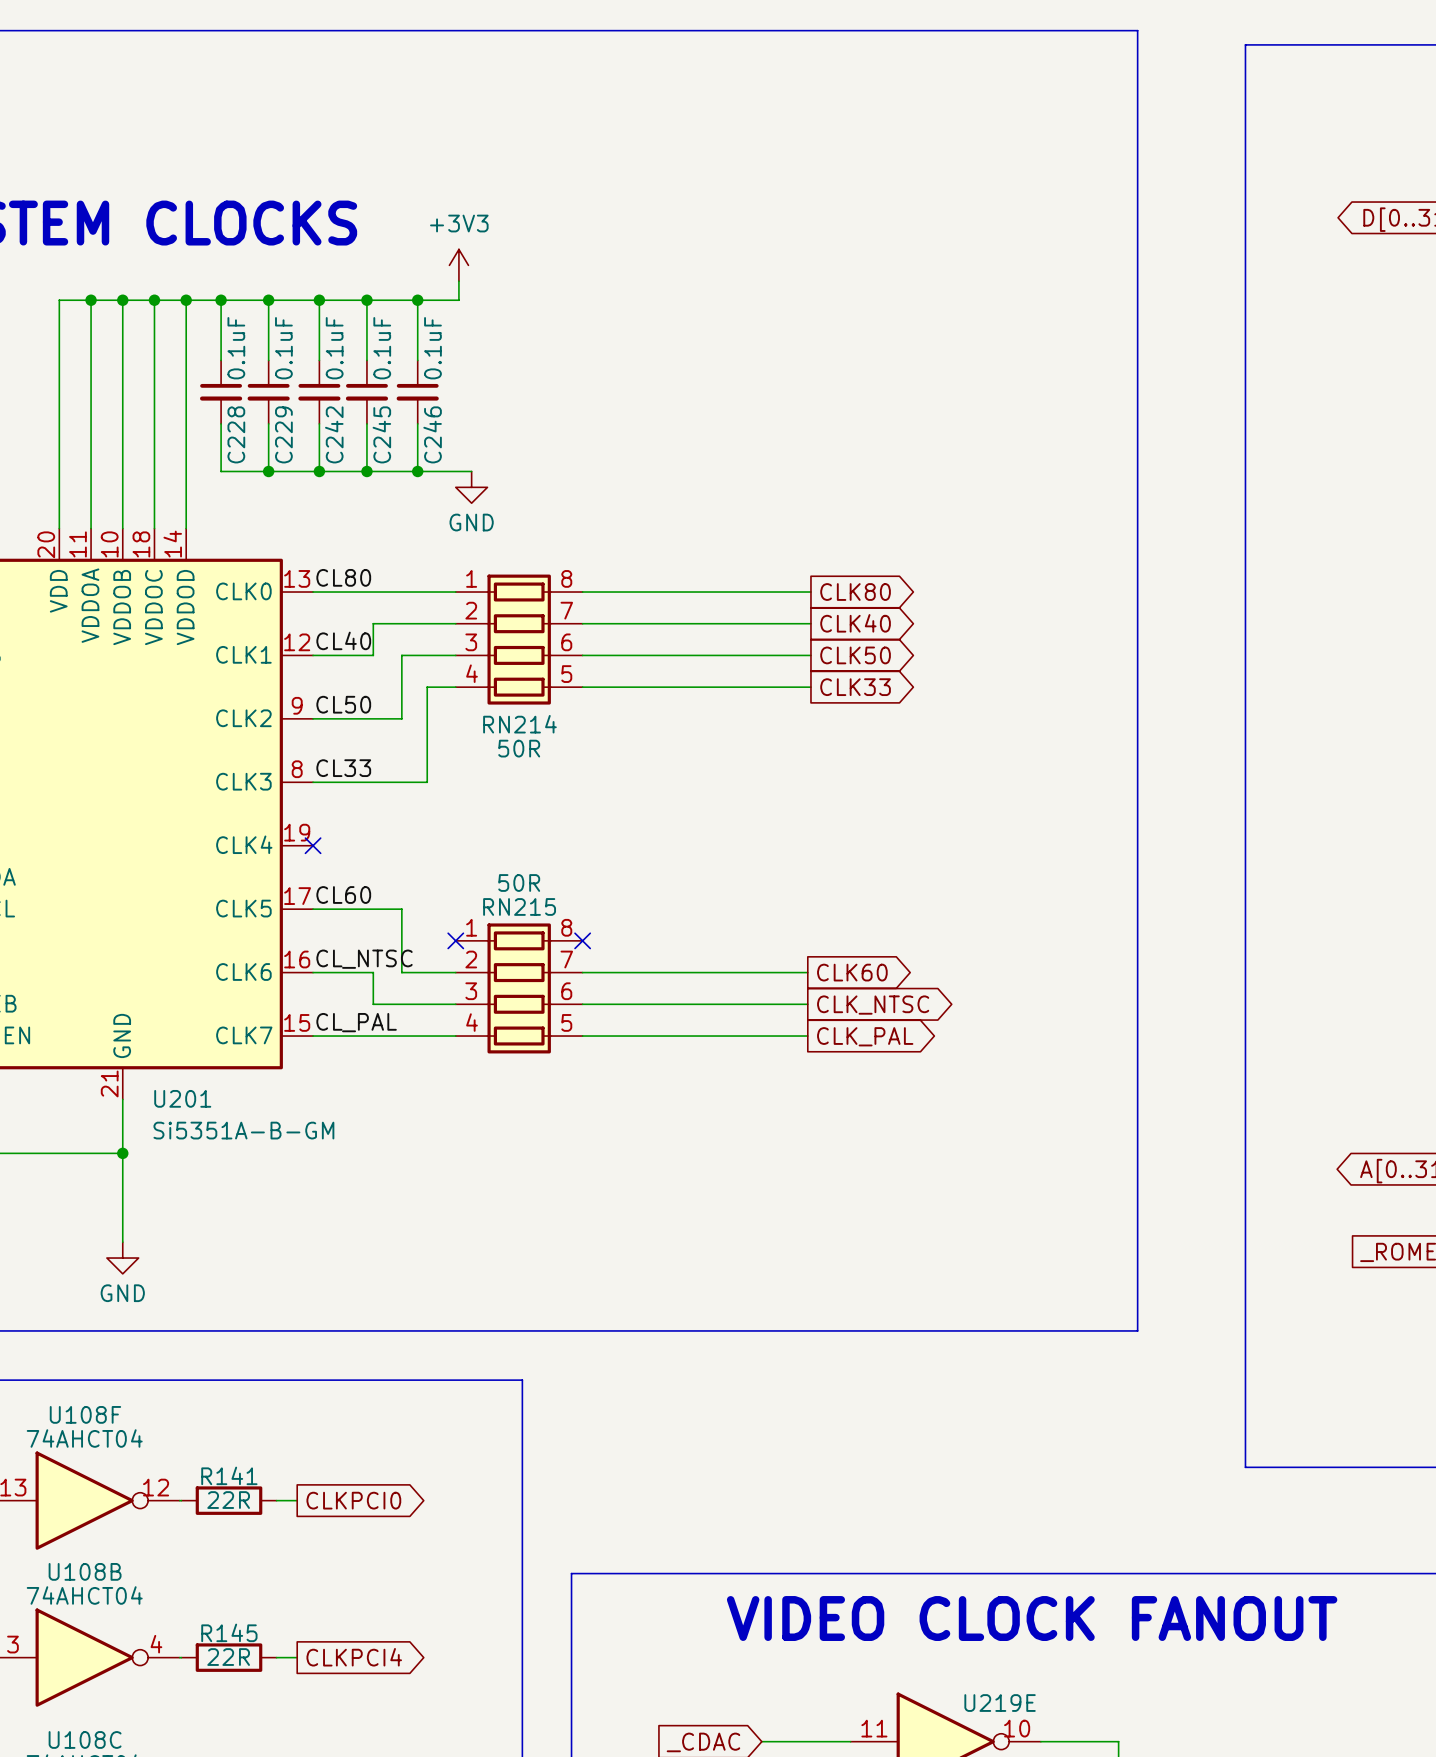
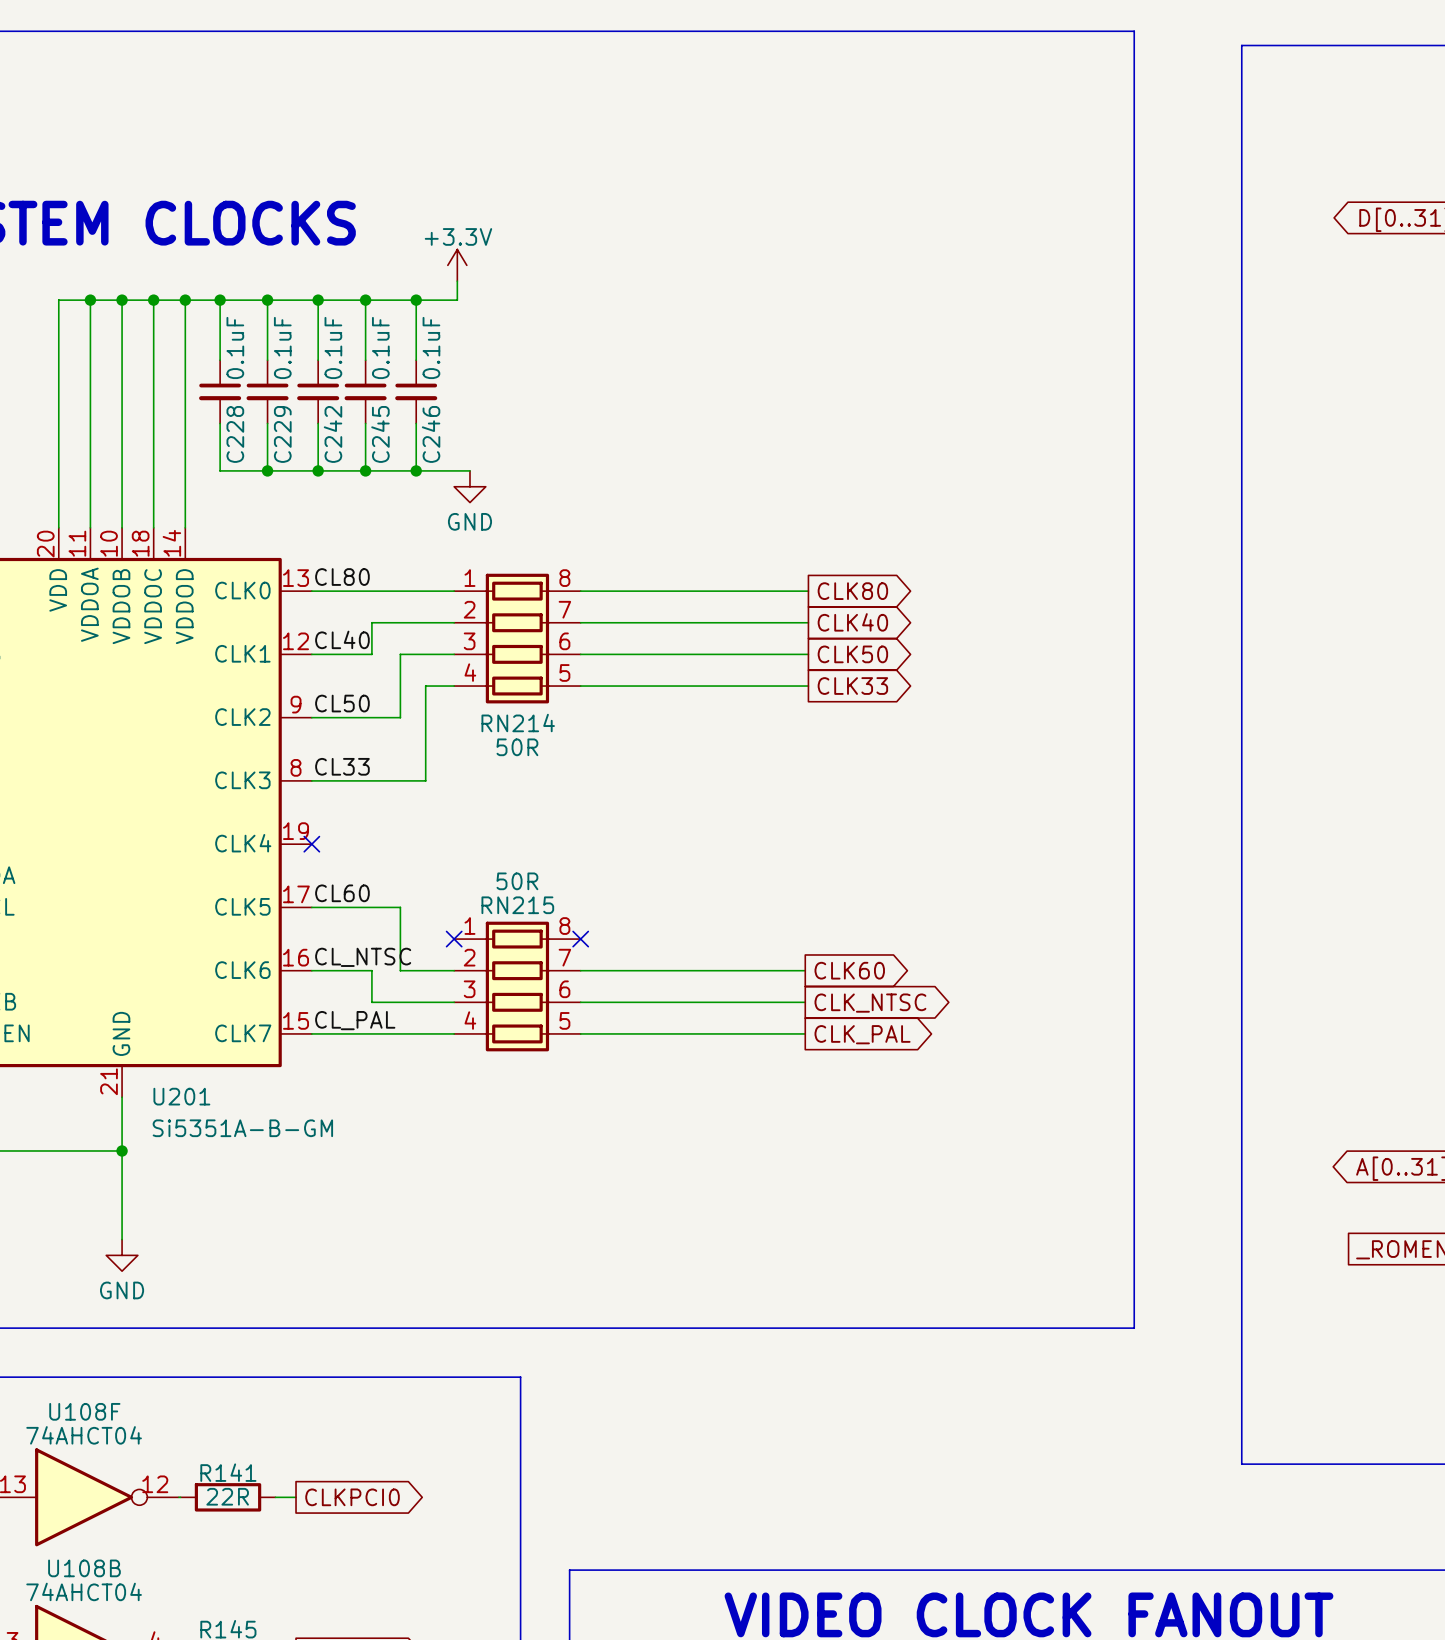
power symbol: +3V3 (458, 265) -> +3.3V (457, 265)

